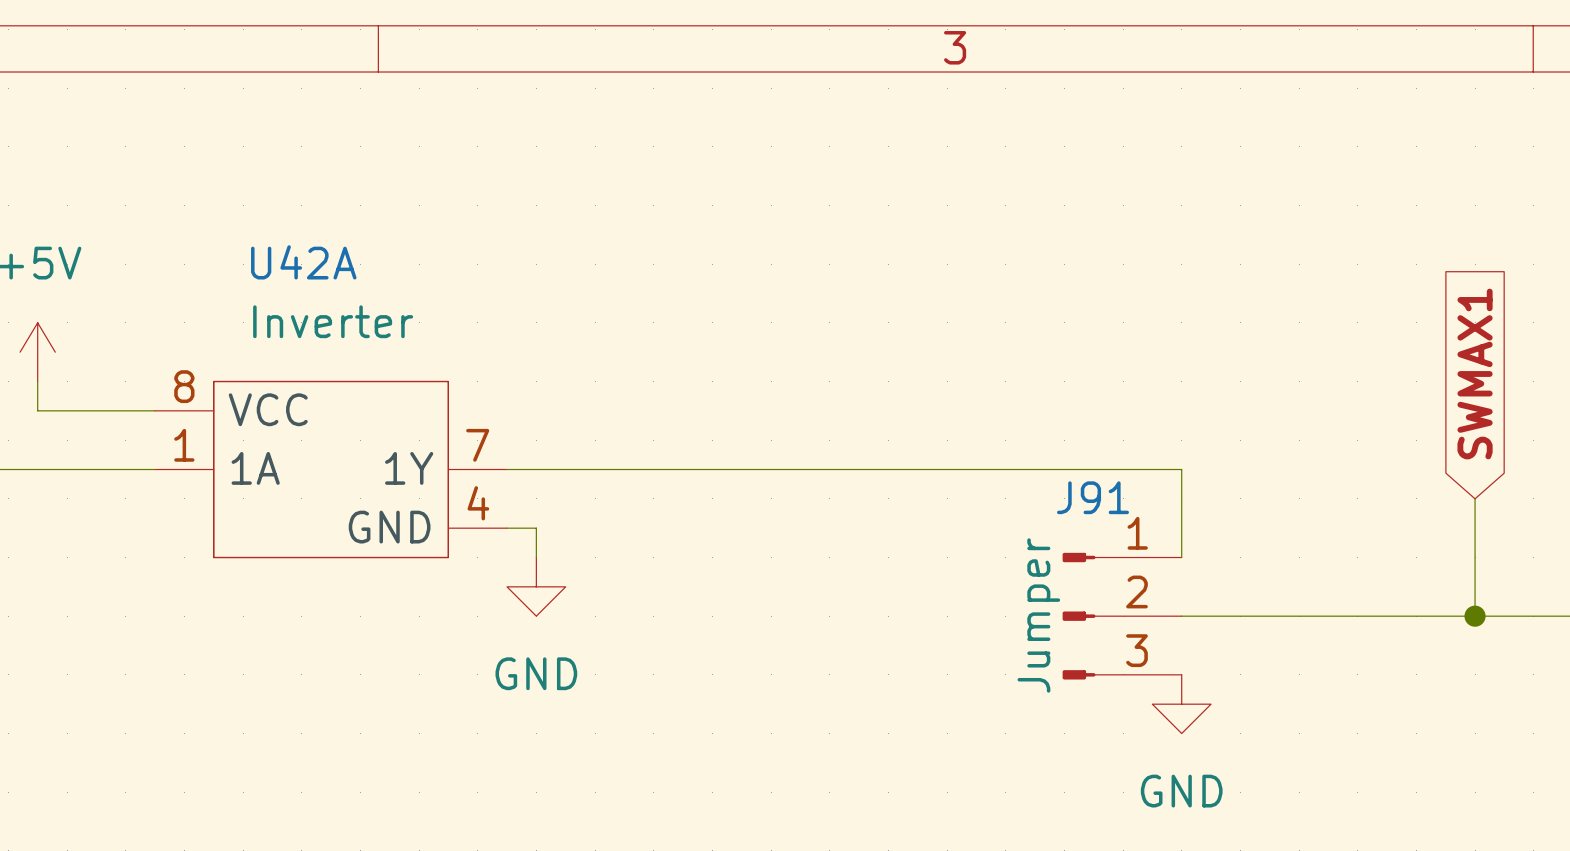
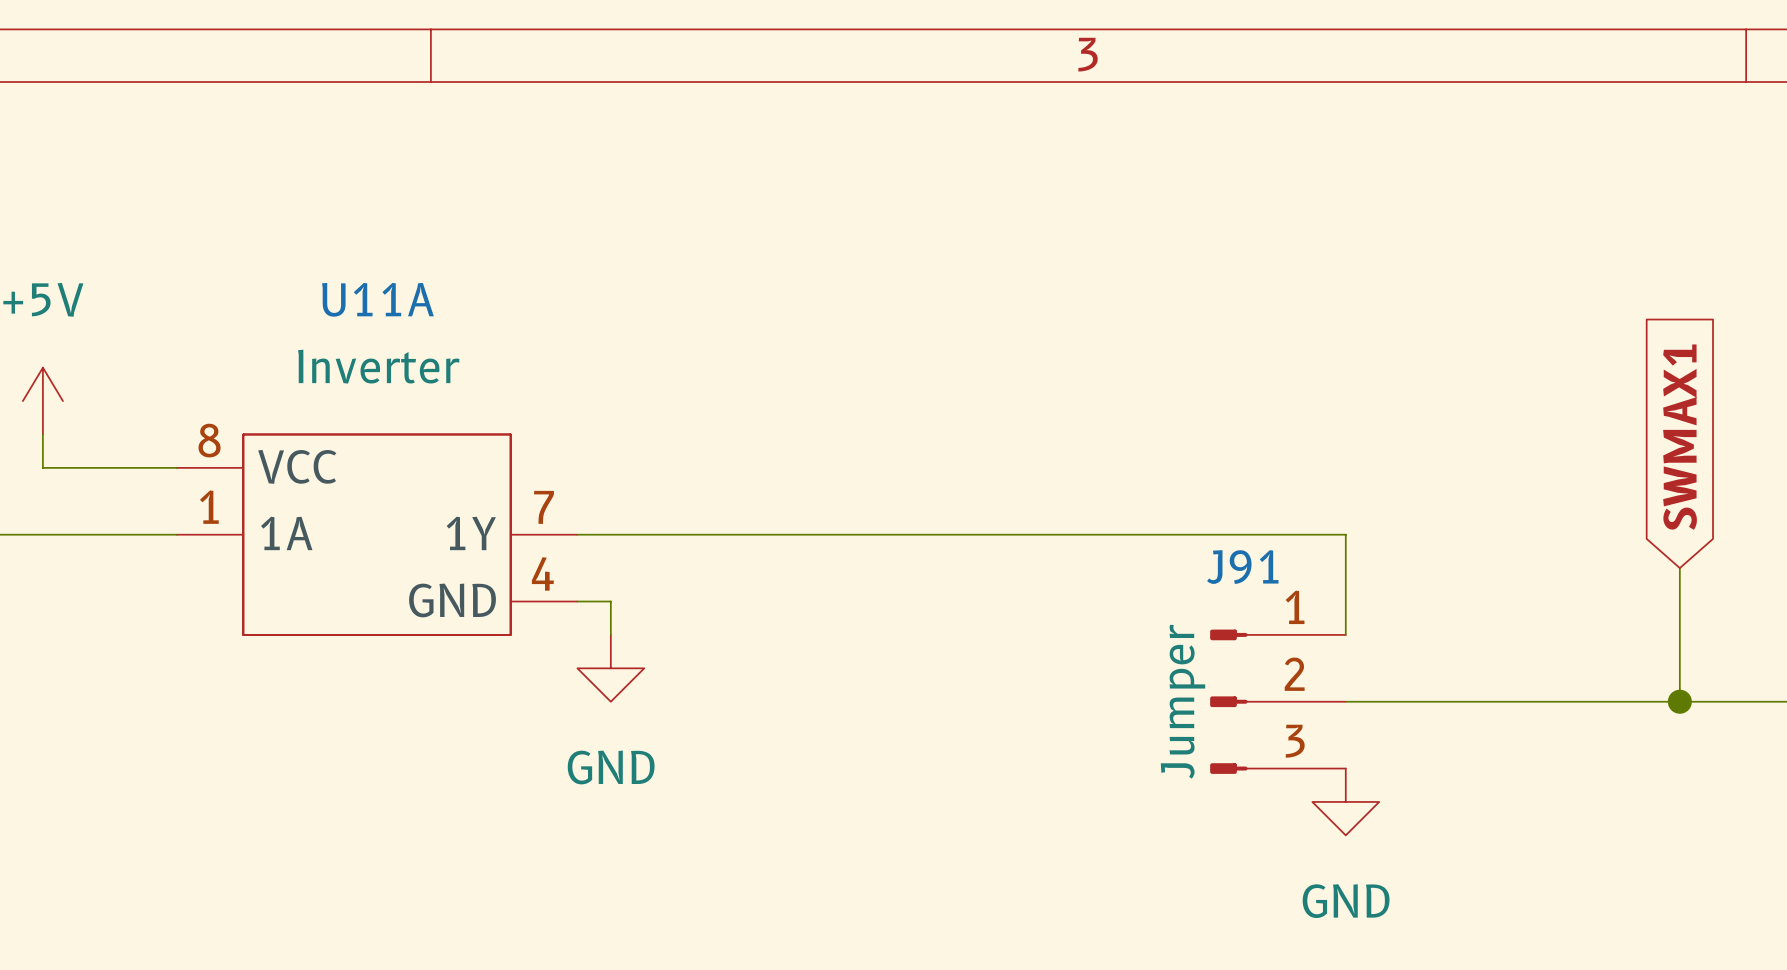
U42A name: U42A (303, 262) -> U11A (377, 299)

